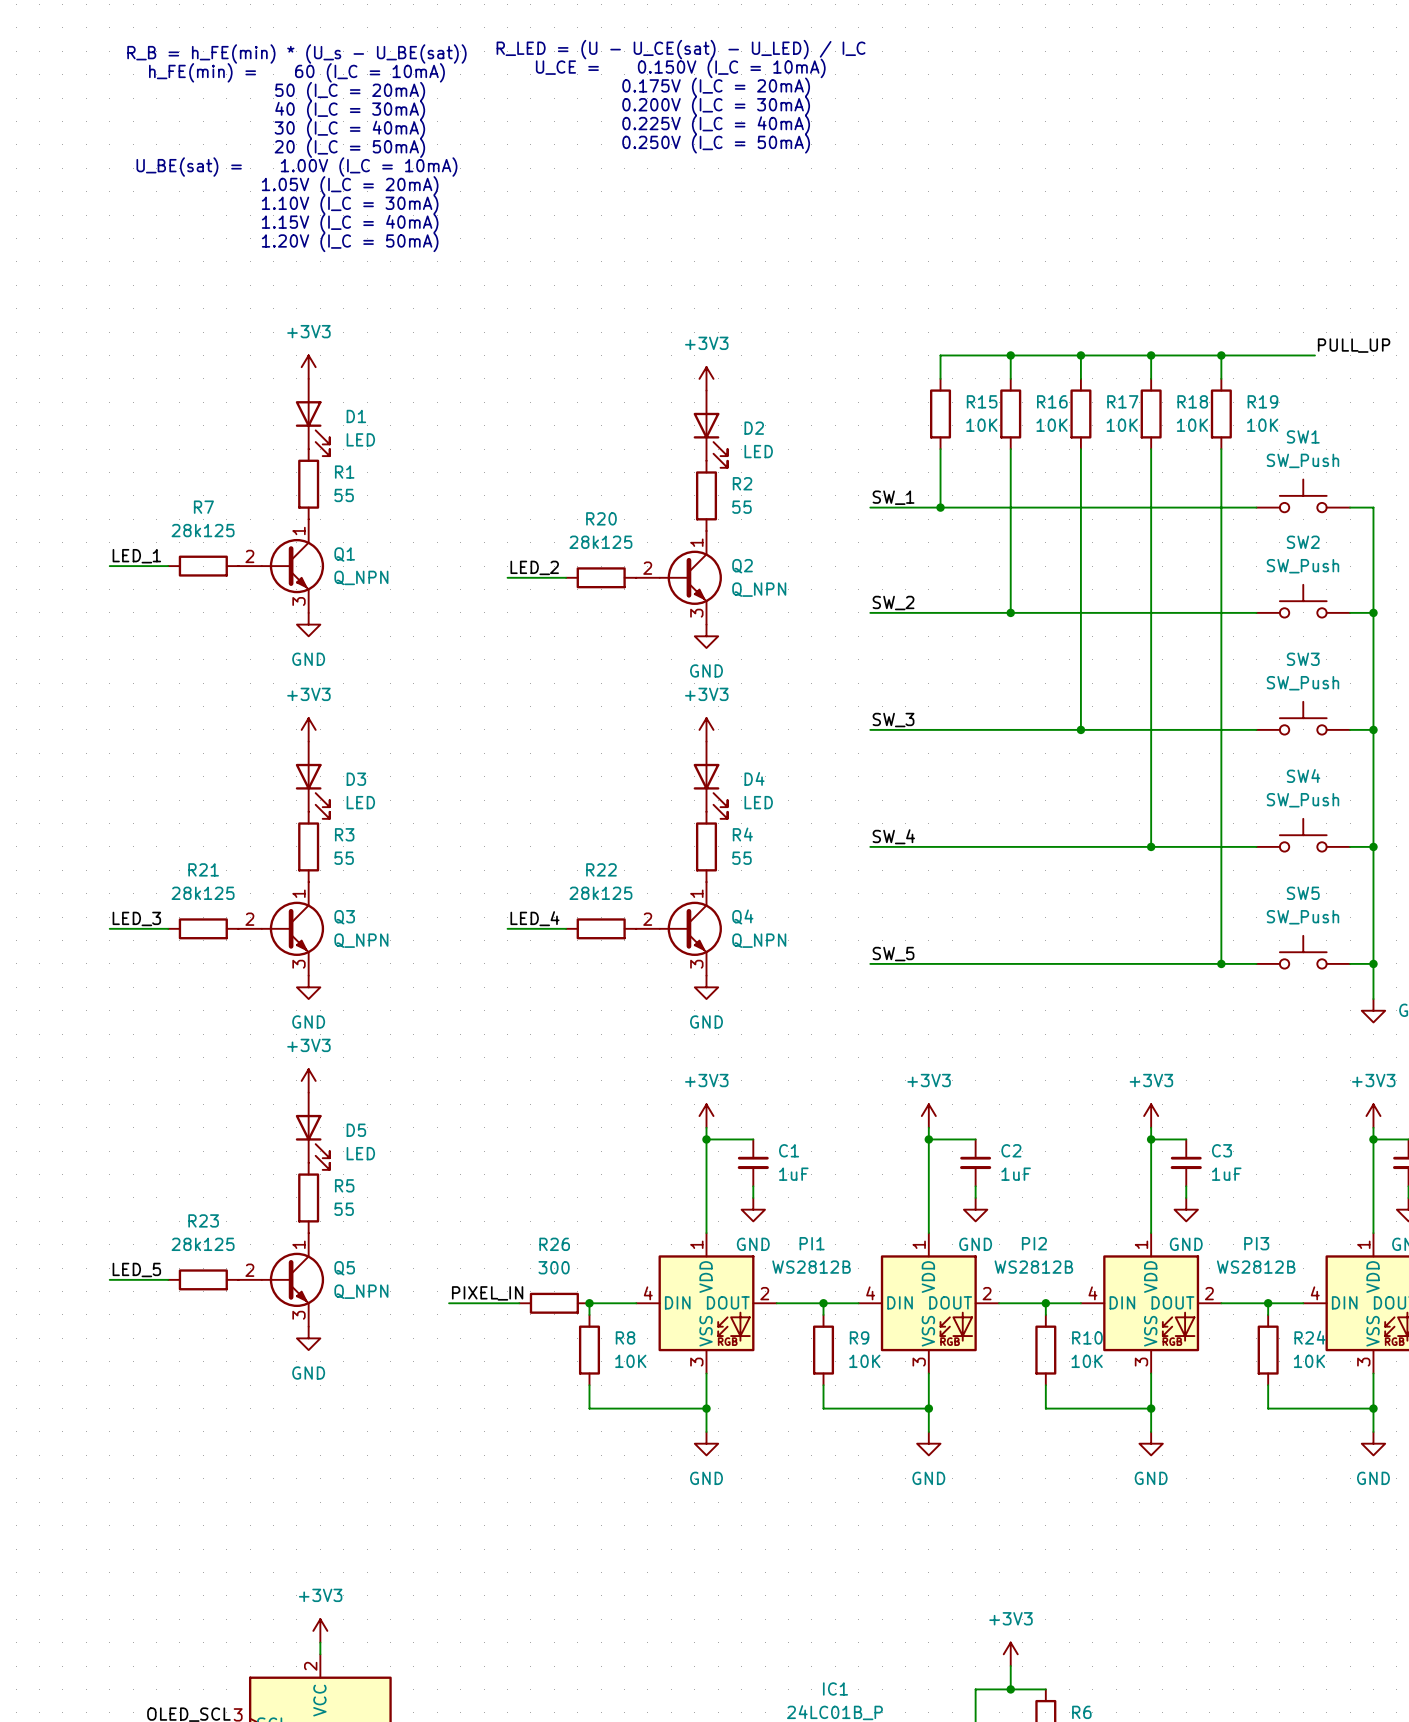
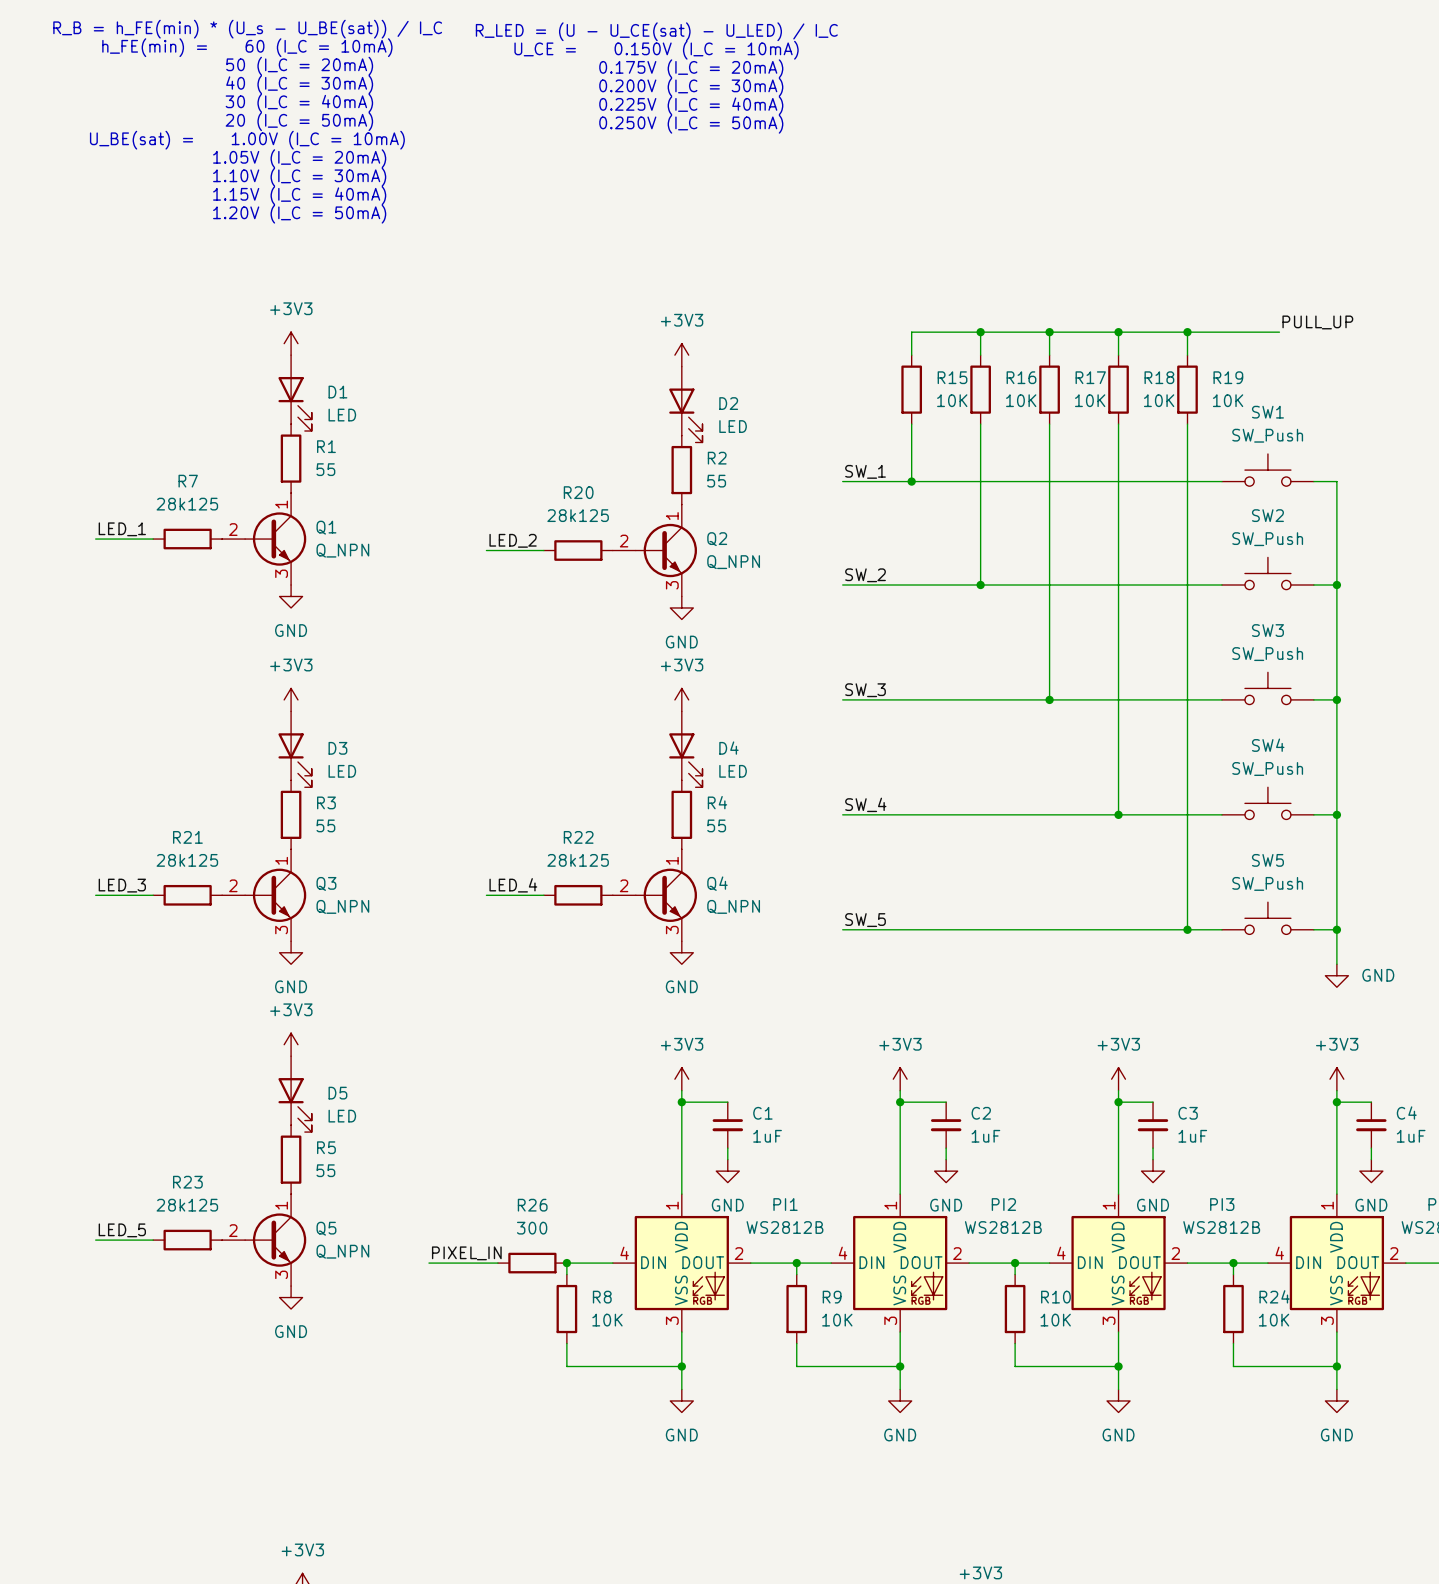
text: R_B = h_FE(min) * (U_s - U_BE(sat)) (296, 53) -> R_B = h_FE(min) * (U_s - U_BE(sat)) / I_C (247, 29)
text position: h_FE(min) = 60 (I_C = 10mA) (296, 72) -> h_FE(min) = 60 (I_C = 10mA) (247, 47)
text position: 50 (I_C = 20mA) (350, 91) -> 50 (I_C = 20mA) (299, 66)
text position: 40 (I_C = 30mA) (350, 110) -> 40 (I_C = 30mA) (299, 84)
text position: 30 (I_C = 40mA) (349, 129) -> 30 (I_C = 40mA) (299, 103)
text position: 20 (I_C = 50mA) (349, 148) -> 20 (I_C = 50mA) (299, 121)
text position: U_BE(sat) = 1.00V (I_C = 10mA) (296, 167) -> U_BE(sat) = 1.00V (I_C = 10mA) (247, 140)
text position: 1.05V (I_C = 20mA) (350, 185) -> 1.05V (I_C = 20mA) (299, 158)
text position: 1.10V (I_C = 30mA) (350, 204) -> 1.10V (I_C = 30mA) (299, 177)
text position: 1.15V (I_C = 40mA) (350, 223) -> 1.15V (I_C = 40mA) (299, 195)
text position: 1.20V (I_C = 50mA) (350, 242) -> 1.20V (I_C = 50mA) (299, 214)

